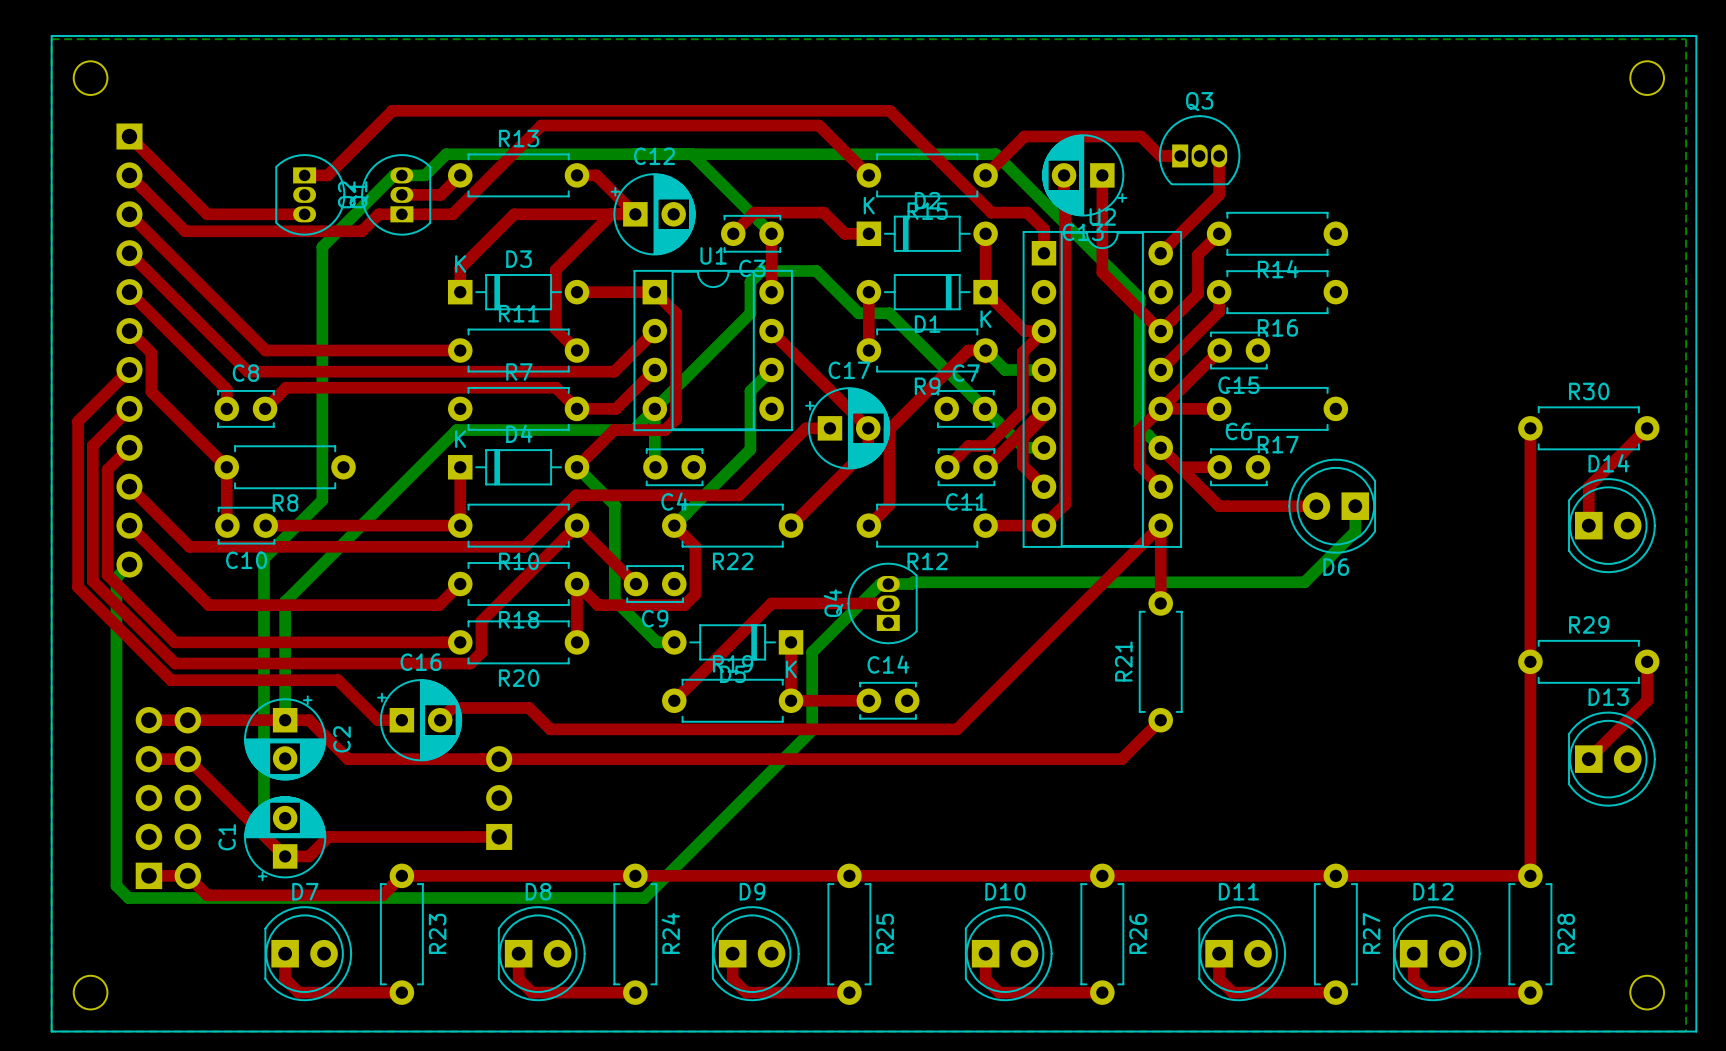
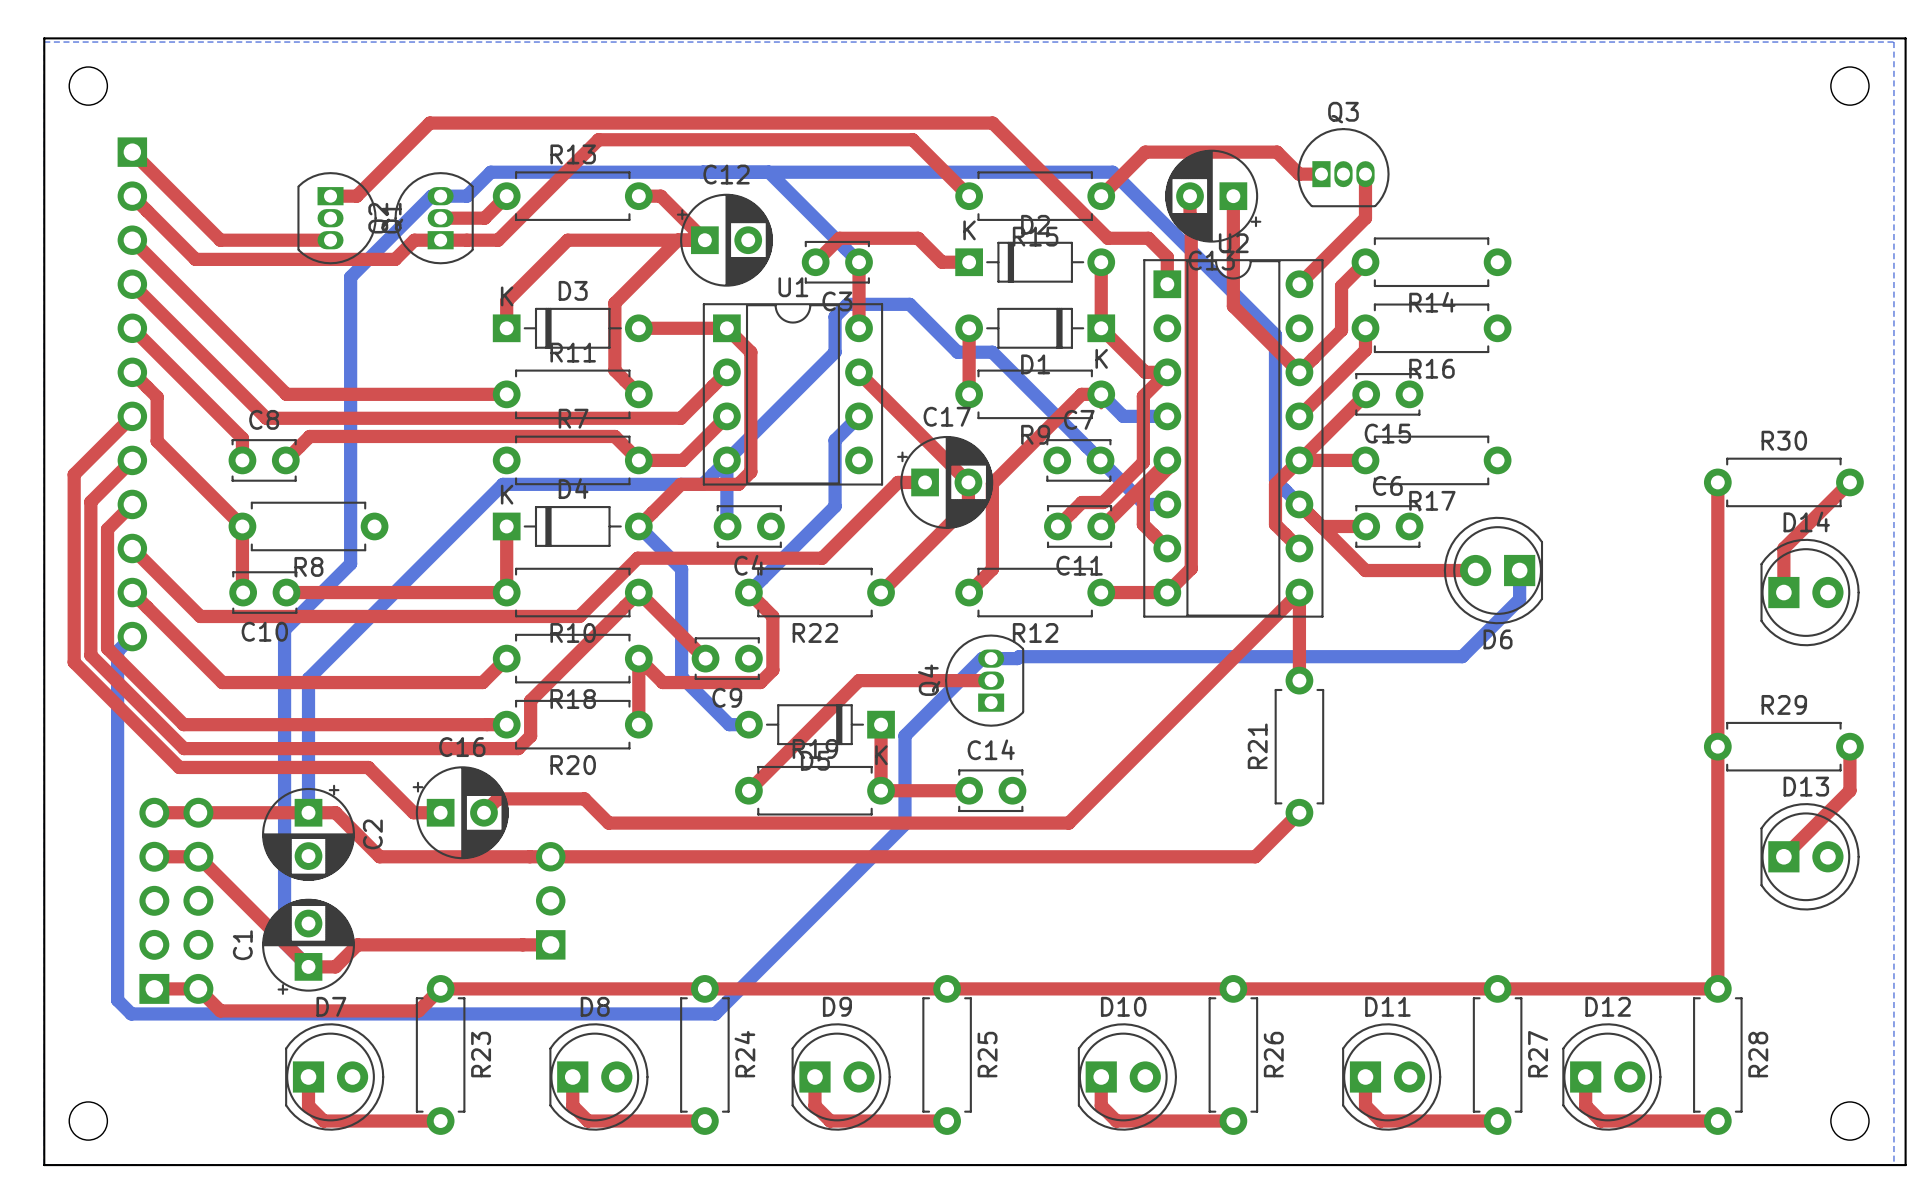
line: (51, 35) (1696, 35) (1696, 1031) (51, 1031) (51, 35) -> none
board edge: none -> (44, 38) (1905, 38) (1905, 1165) (44, 1165) (44, 38)

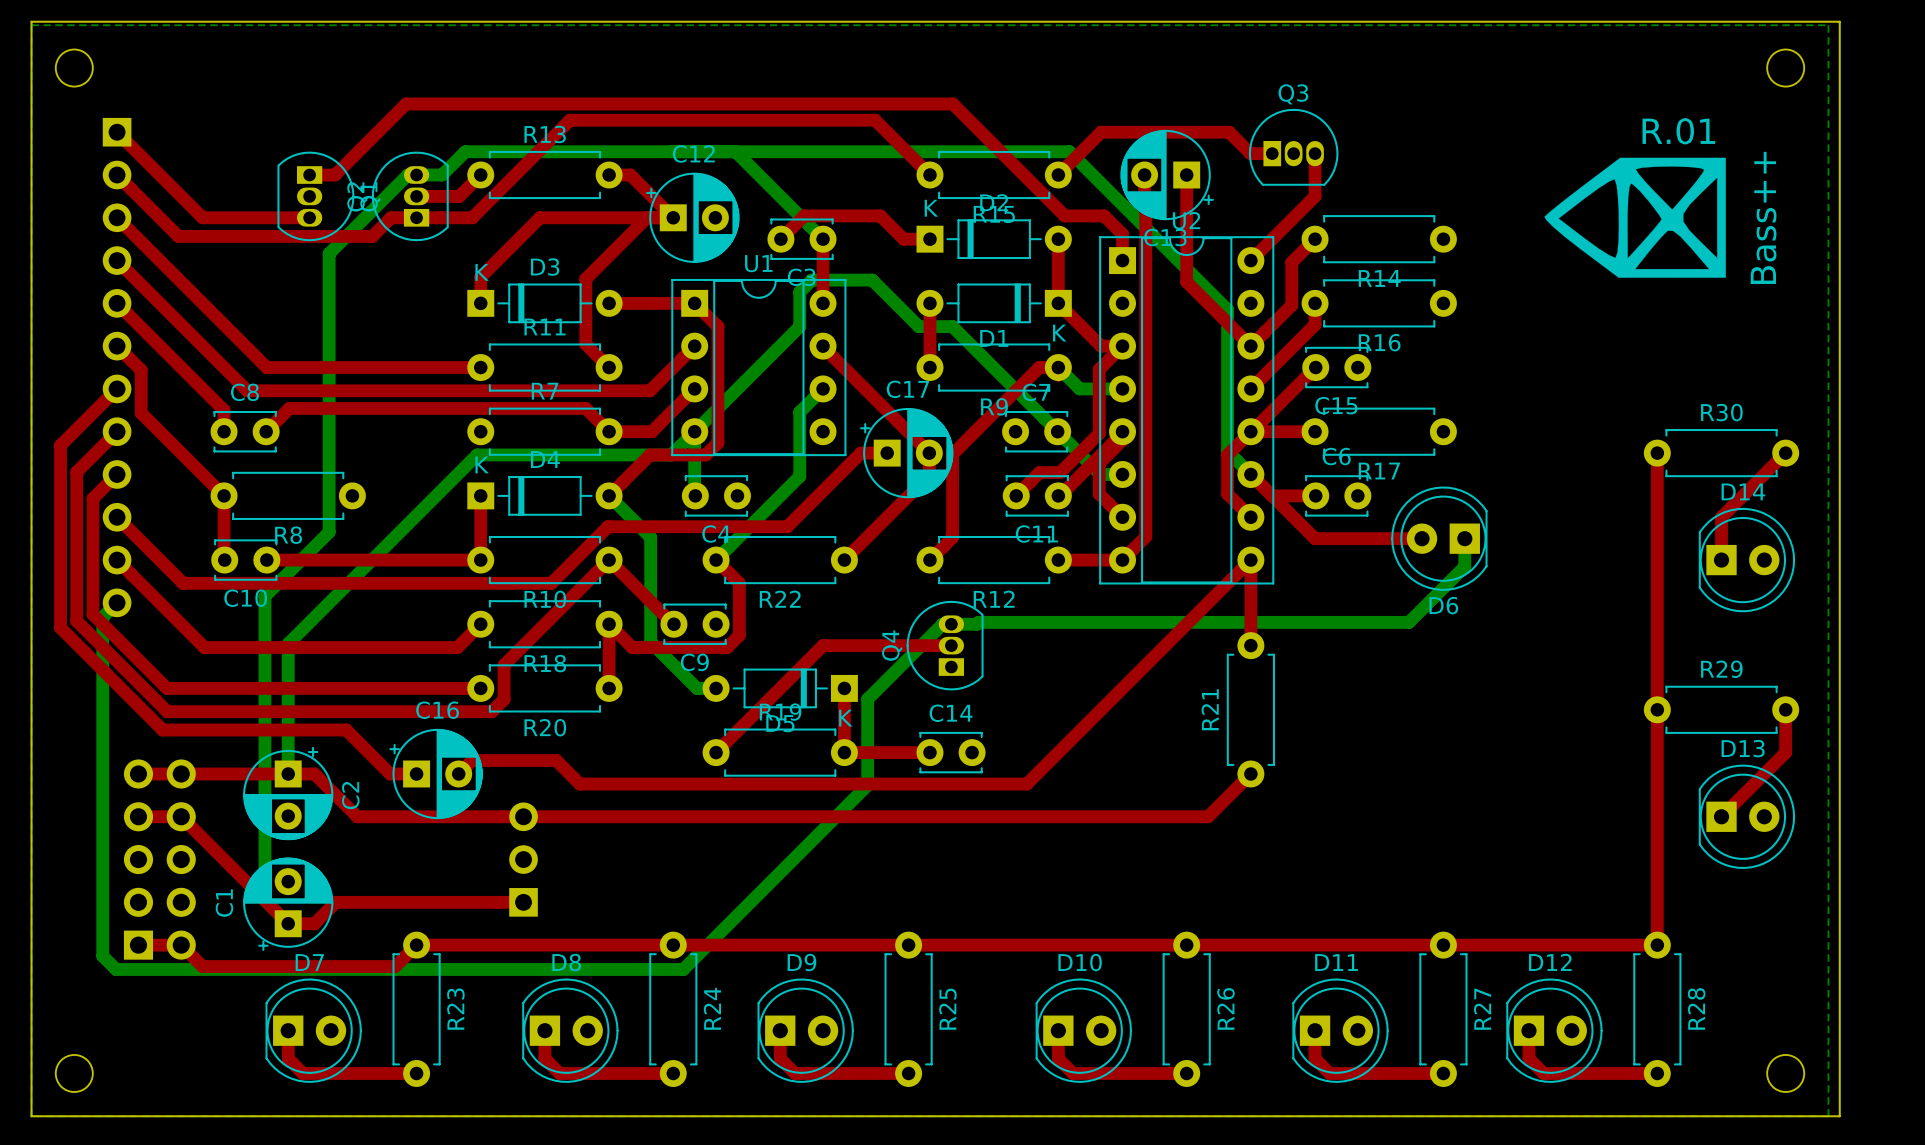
text: none -> R.01 (1678, 131)
drawing: none -> [1544, 157, 1726, 278]
text: none -> Bass++ (1763, 217)

